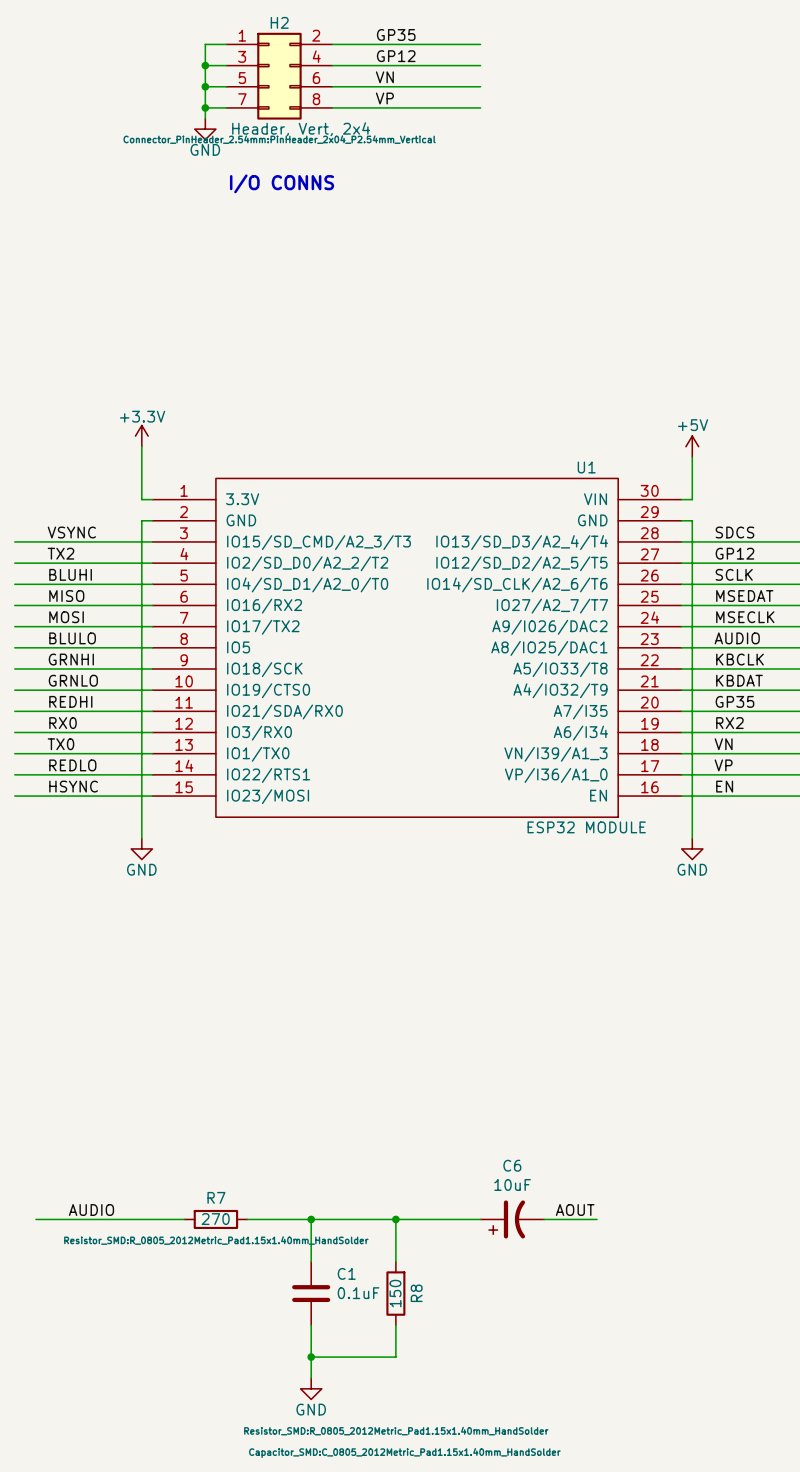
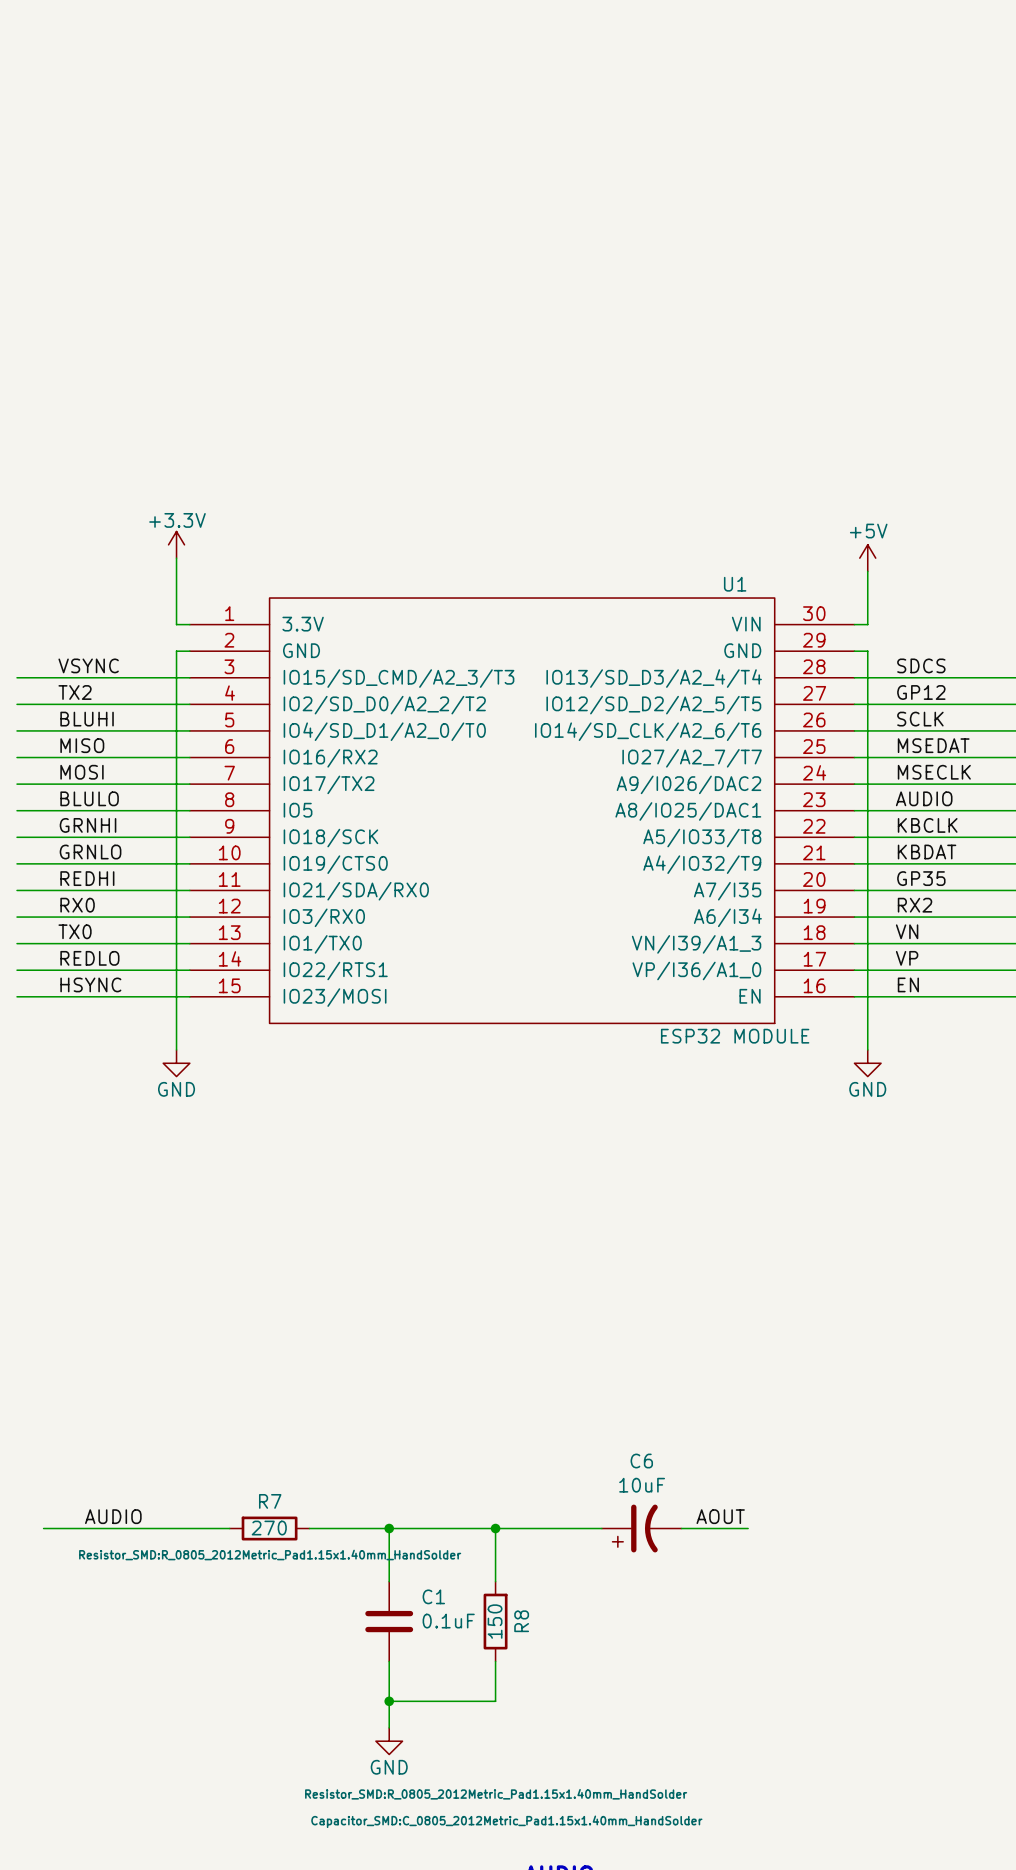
label: GP35 (396, 34) -> none
wire: (226, 44) (205, 44) (205, 118) -> none
wire: (332, 44) (480, 44) -> none
label: GP12 (396, 56) -> none
wire: (205, 65) (226, 65) -> none
junction: (205, 65) -> none
wire: (332, 65) (480, 65) -> none
H2: Header, Vert, 2x4 (279, 76) -> none
label: VN (384, 77) -> none
wire: (205, 86) (226, 86) -> none
junction: (205, 86) -> none
wire: (332, 86) (480, 86) -> none
label: VP (384, 98) -> none
wire: (205, 107) (226, 107) -> none
junction: (205, 107) -> none
wire: (332, 107) (480, 107) -> none
power symbol: GND (205, 129) -> none
text: I/O CONNS (282, 183) -> none

